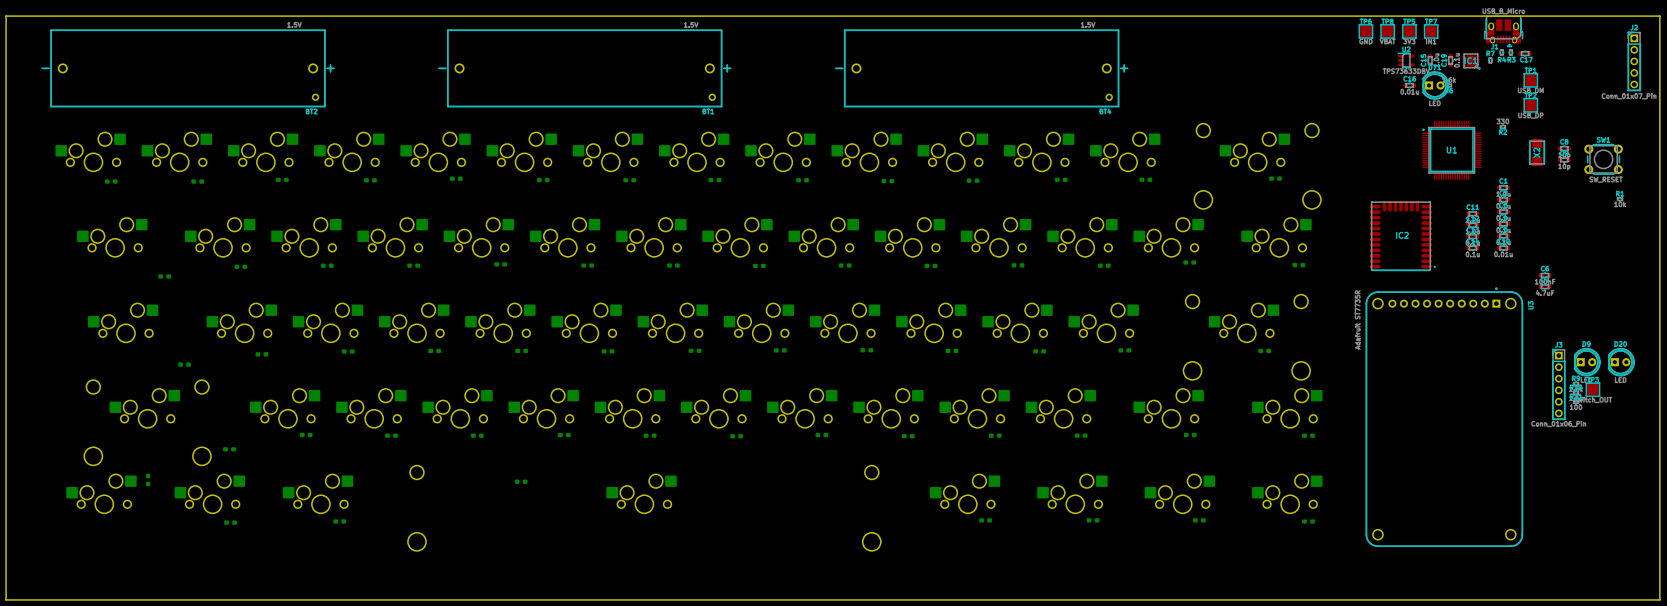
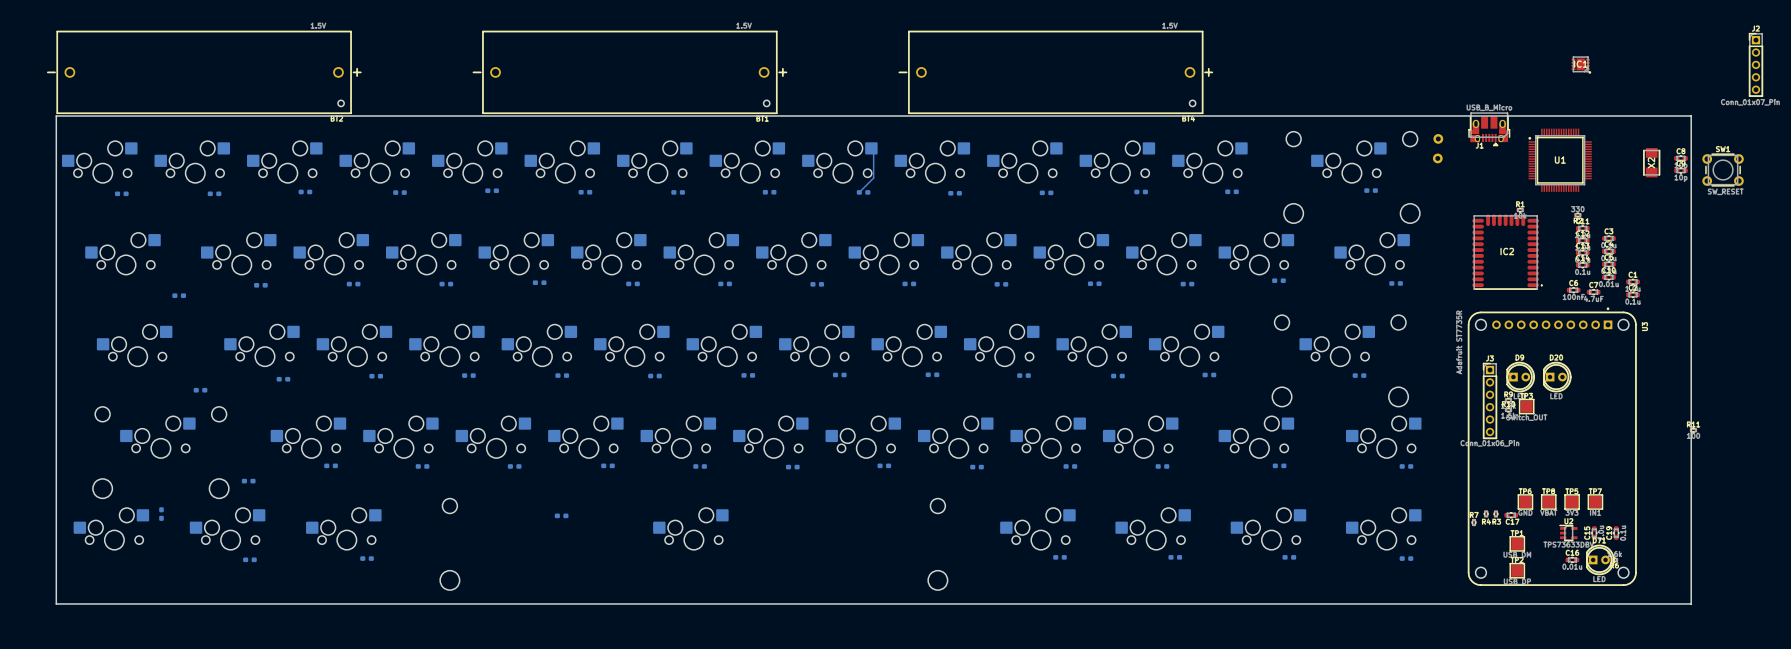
board edge: (6, 16) (1659, 16) (1659, 599) (6, 599) (6, 16) -> (56, 115) (56, 603) (1691, 603) (1691, 115) (56, 115)
part position: (1365, 31) -> (1525, 501)
part position: (1387, 31) -> (1548, 501)
part position: (1409, 31) -> (1572, 501)
part position: (1431, 31) -> (1595, 501)
part position: (1503, 31) -> (1489, 129)
part position: (1501, 52) -> (1486, 513)
part position: (1510, 52) -> (1495, 513)
part position: (1525, 53) -> (1511, 515)
part position: (1406, 60) -> (1568, 533)
part position: (1430, 60) -> (1594, 533)
part position: (1450, 60) -> (1616, 533)
part position: (1490, 60) -> (1474, 522)
part position: (1530, 80) -> (1517, 543)
part position: (1409, 85) -> (1572, 559)
part position: (1435, 85) -> (1600, 559)
part position: (1448, 85) -> (1614, 559)
part position: (1530, 105) -> (1517, 570)
part position: (1502, 126) -> (1577, 215)
part: none -> (1438, 138)
bottom track: none -> (871, 148) (873, 150) (873, 178) (859, 192)
part: none -> (1437, 158)
part position: (1503, 187) -> (1633, 281)
part position: (1503, 199) -> (1633, 294)
part position: (1620, 199) -> (1520, 210)
part position: (1503, 211) -> (1608, 238)
part position: (1503, 223) -> (1608, 251)
part position: (1503, 235) -> (1608, 264)
part position: (1503, 248) -> (1608, 277)
part position: (1545, 275) -> (1573, 290)
part position: (1545, 286) -> (1593, 292)
part position: (1587, 362) -> (1520, 377)
part position: (1621, 362) -> (1557, 377)
part position: (1576, 383) -> (1508, 400)
part position: (1558, 384) -> (1490, 400)
part position: (1592, 389) -> (1526, 406)
part position: (1576, 392) -> (1508, 410)

